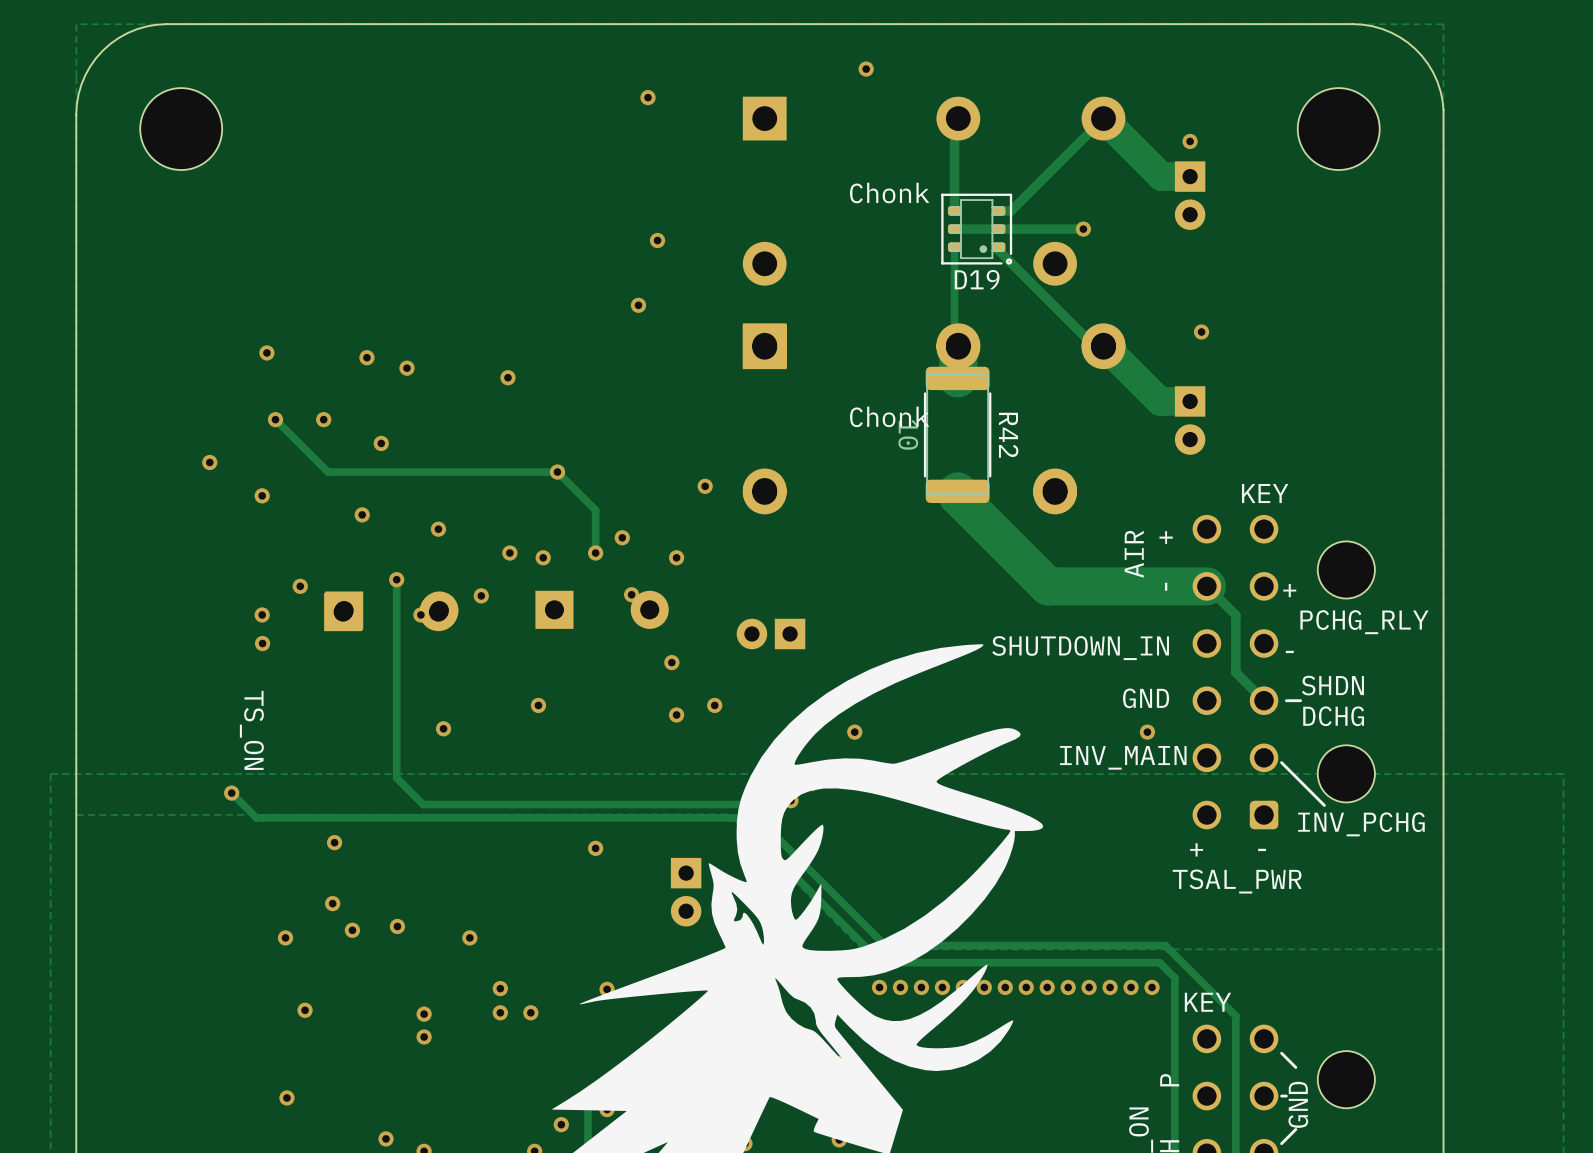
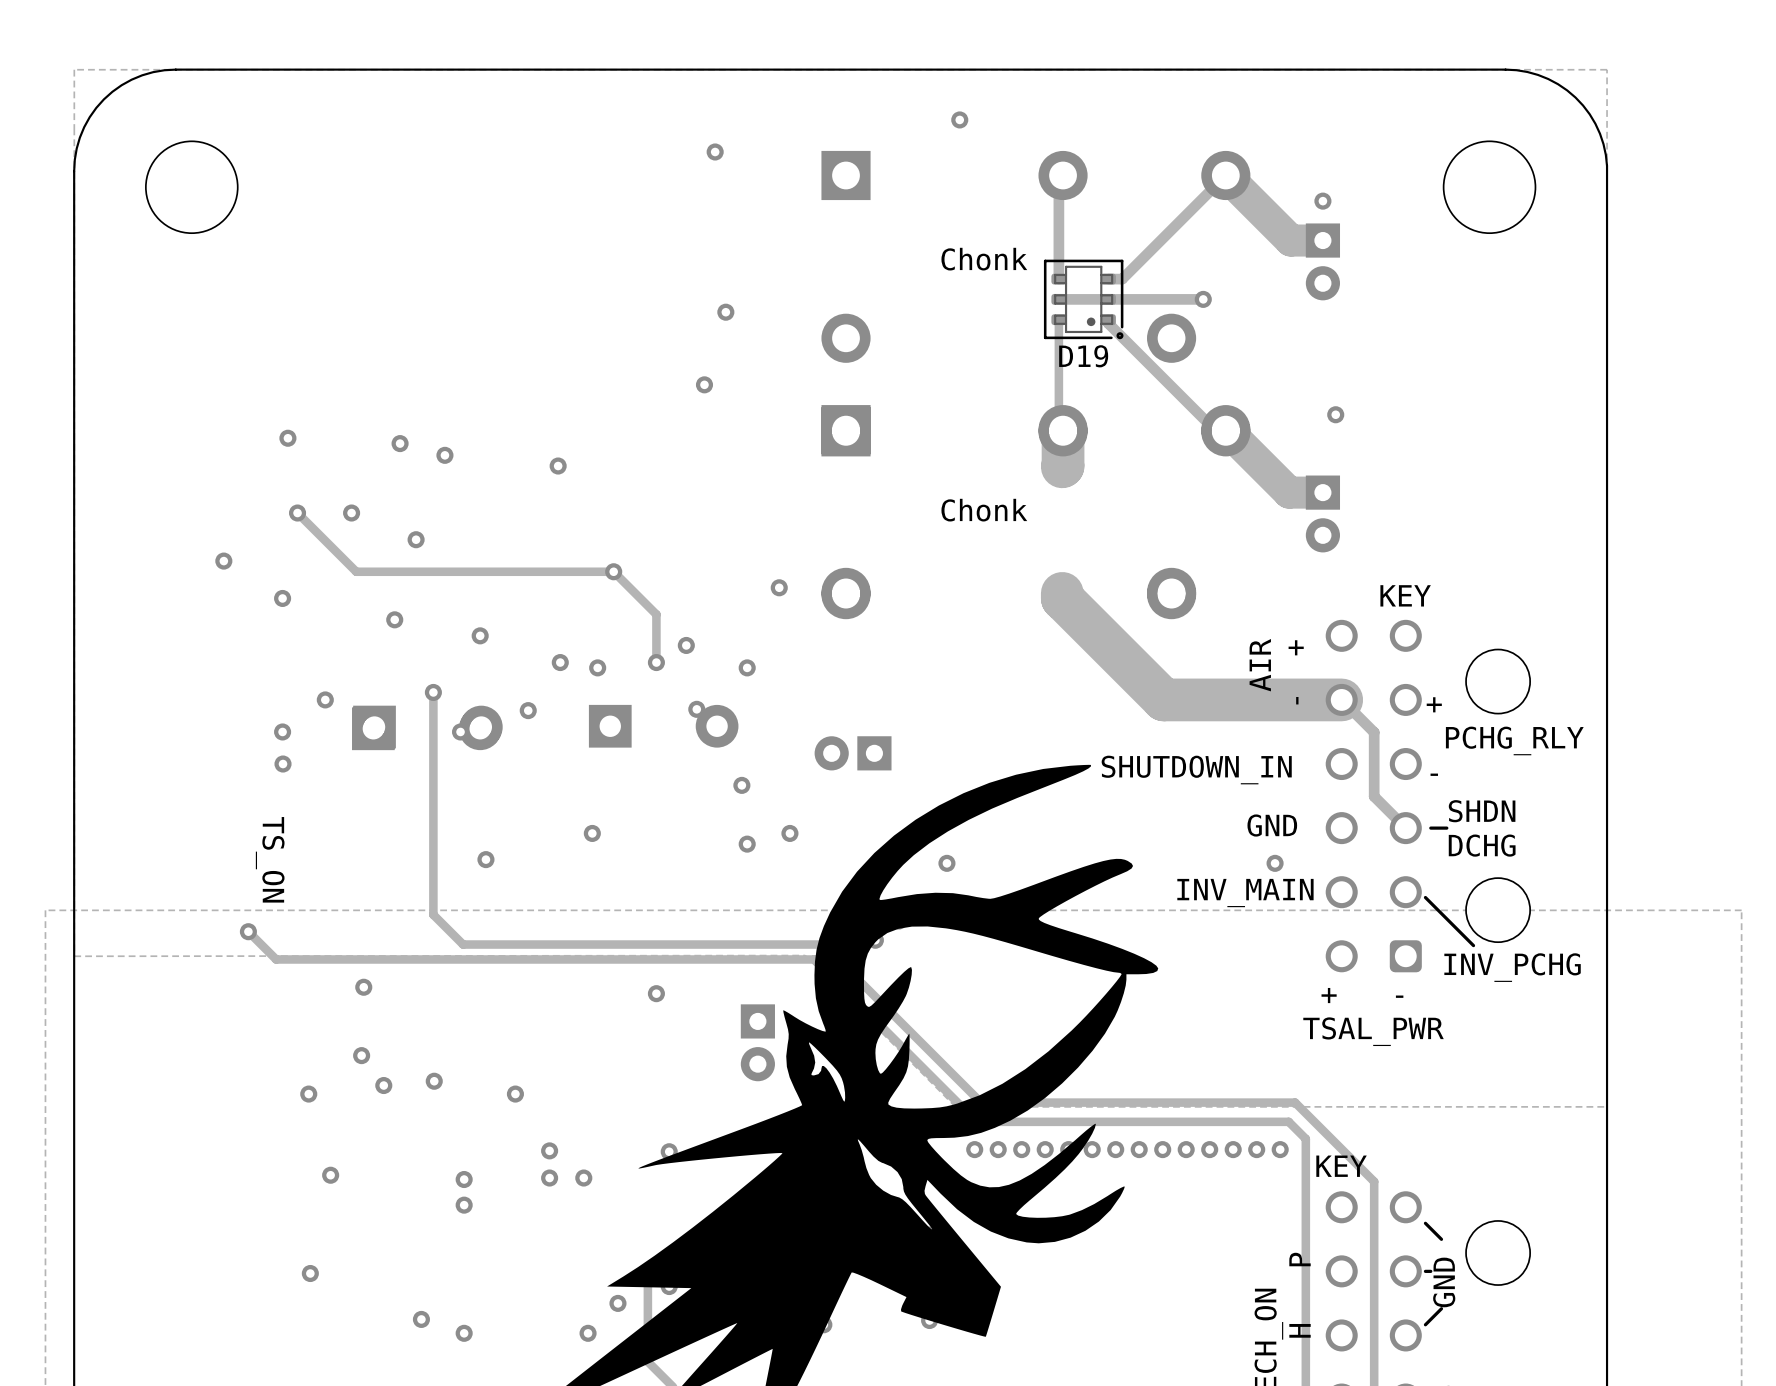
R42: 10 (957, 434) -> none

